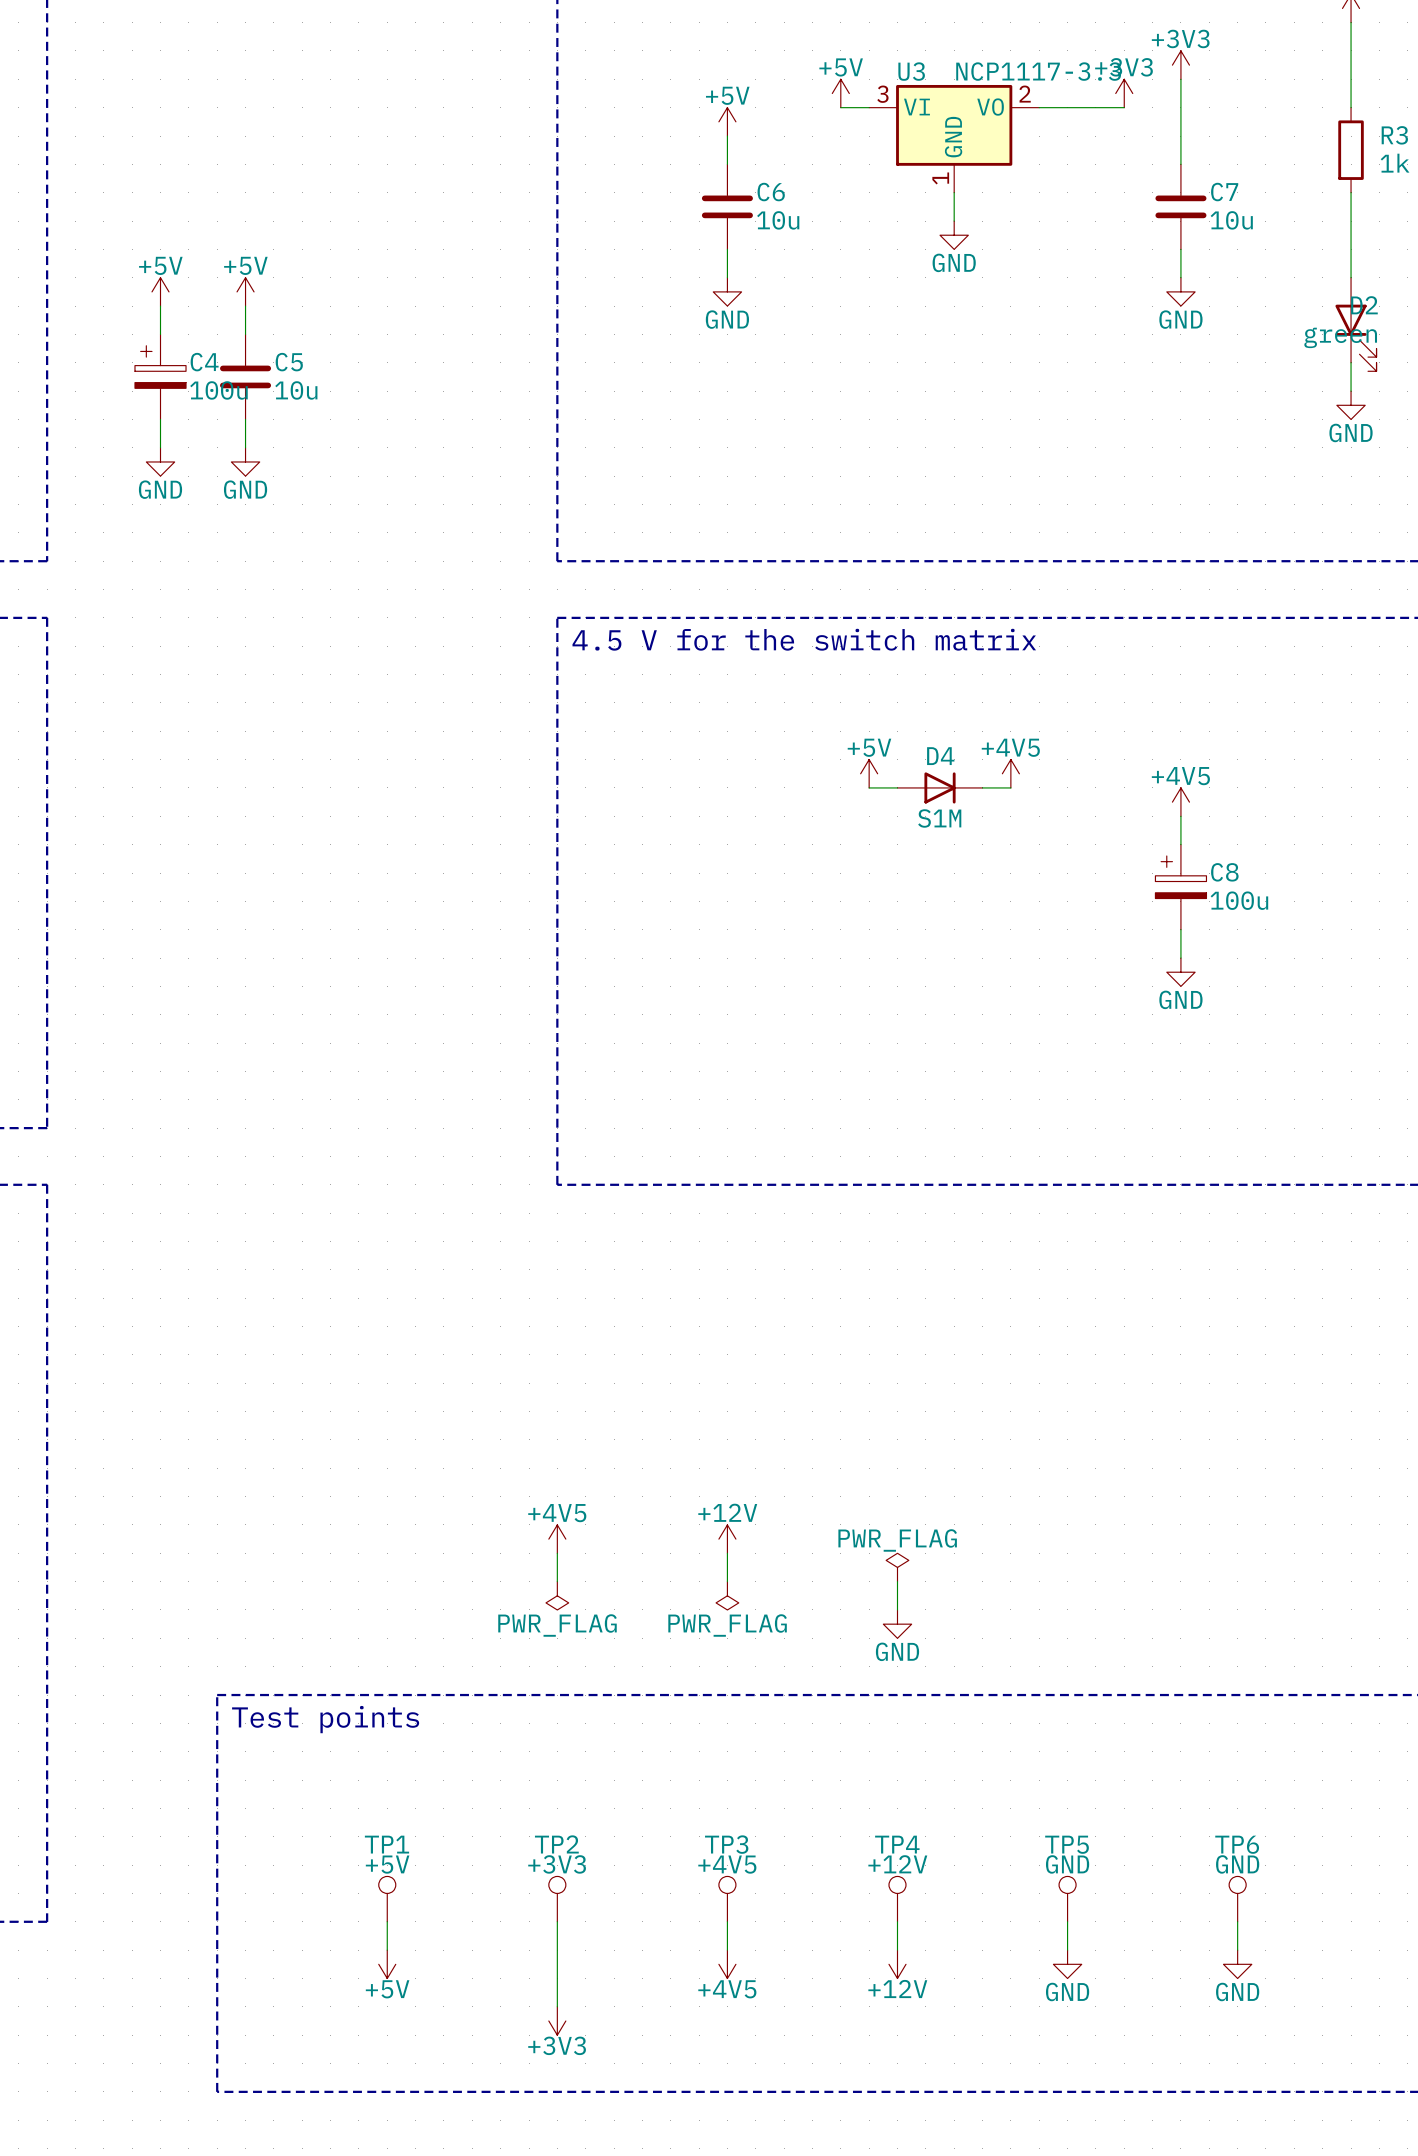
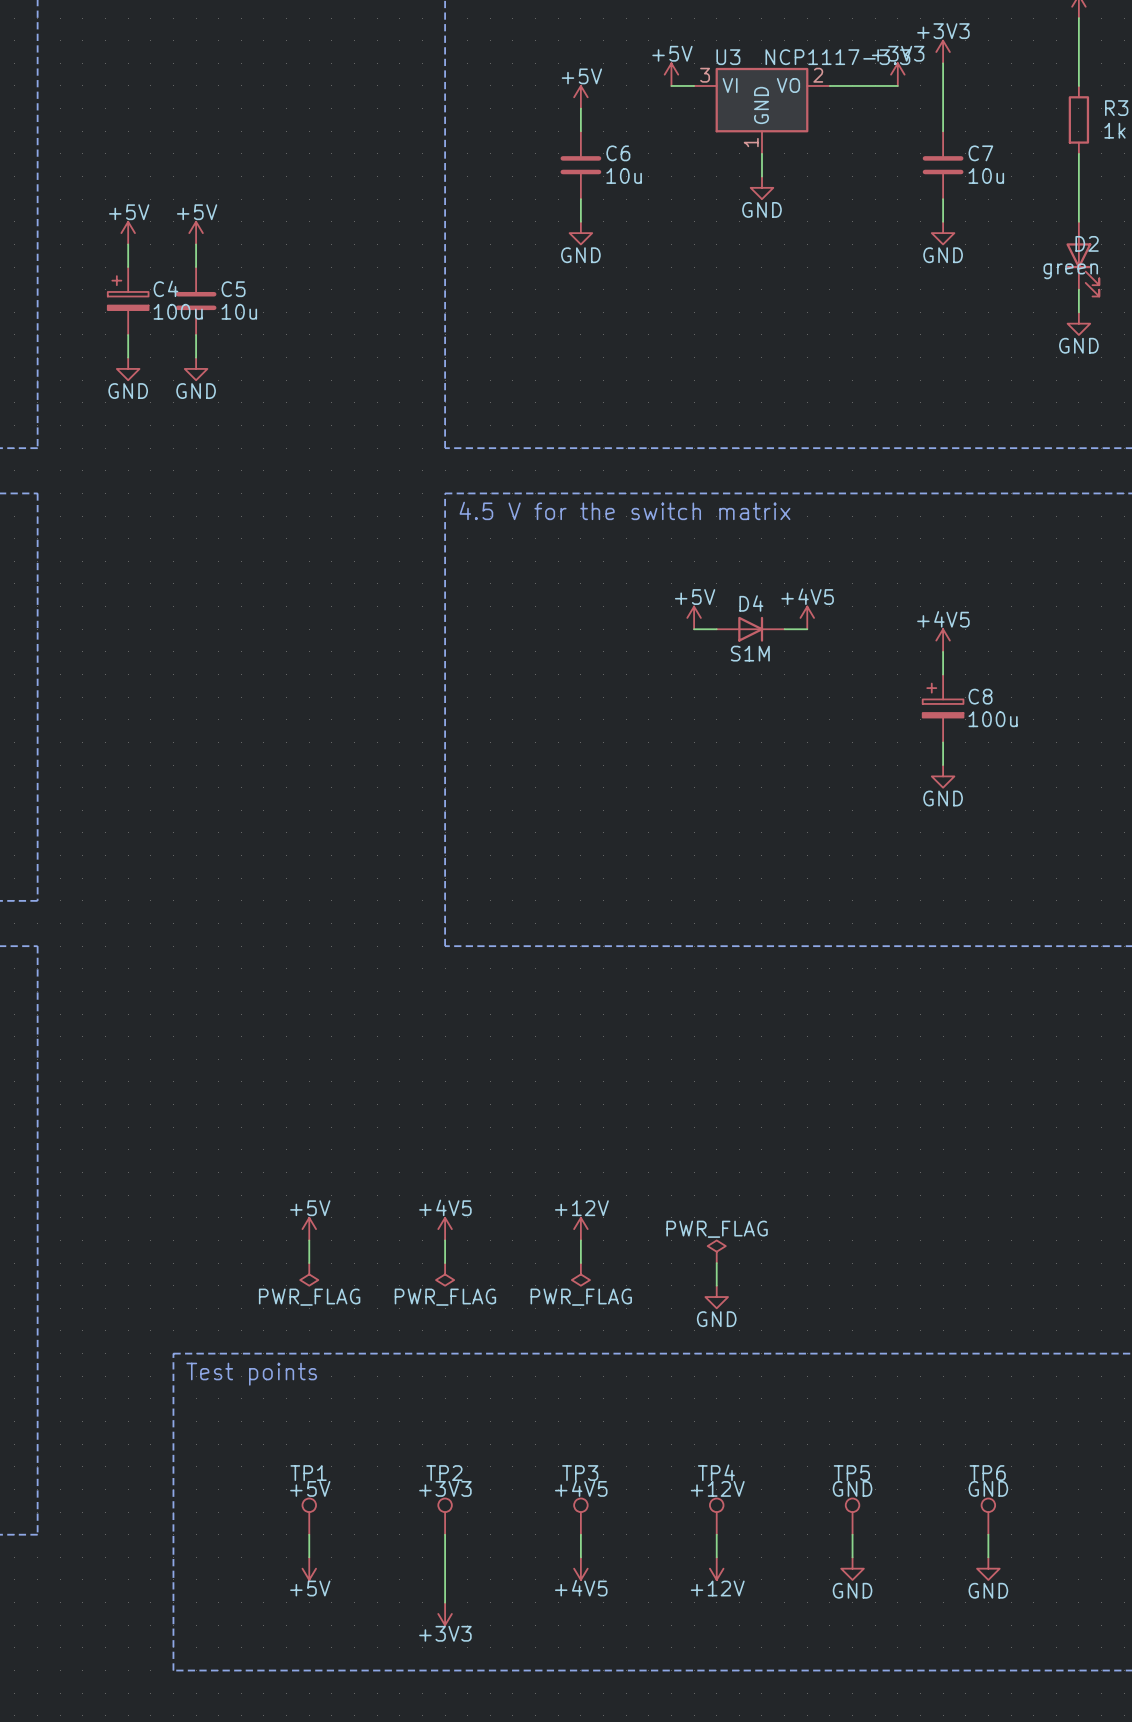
power symbol: none -> +5V (309, 1229)
wire: none -> (309, 1240) (309, 1263)
power symbol: none -> PWR_FLAG (309, 1274)

